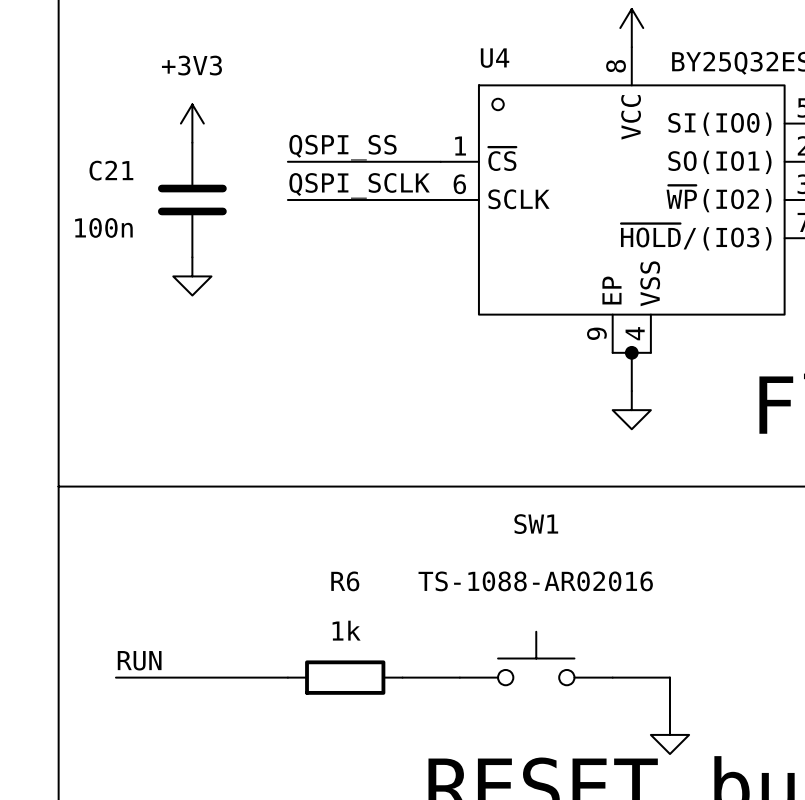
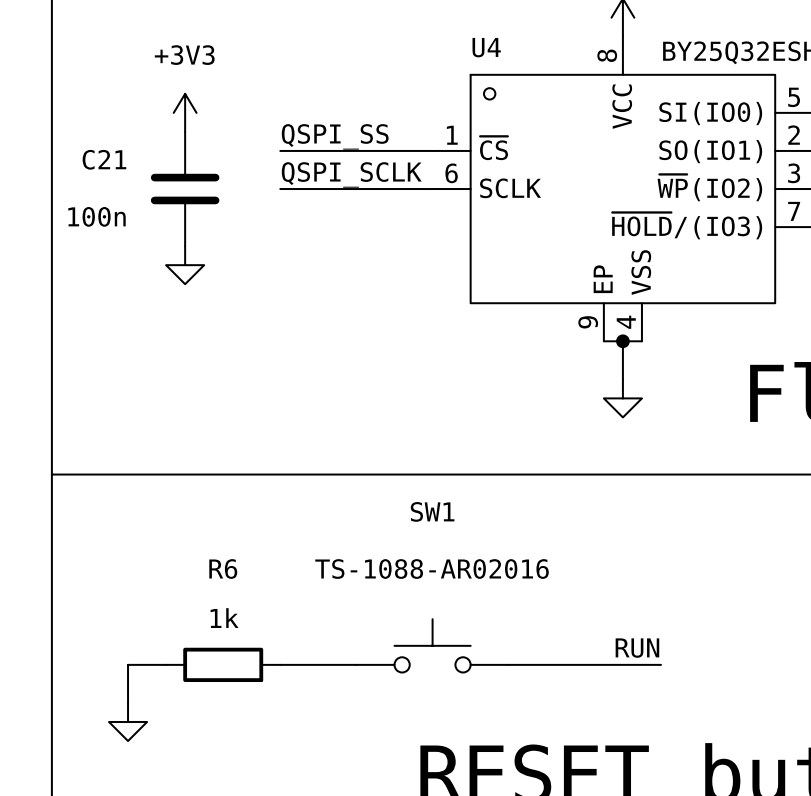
SW1 position: (536, 658) -> (432, 645)
label: RUN (139, 660) -> none
label: none -> RUN (637, 648)
wire: (115, 677) (135, 677) -> (128, 702) (128, 664)
wire: (173, 677) (287, 677) -> (356, 664) (280, 664)
R6 position: (345, 677) -> (223, 664)
wire: (402, 677) (459, 677) -> none
wire: none -> (508, 664) (603, 664)
wire: (669, 677) (669, 715) -> none
power symbol: none -> (128, 721)
power symbol: (669, 734) -> none

